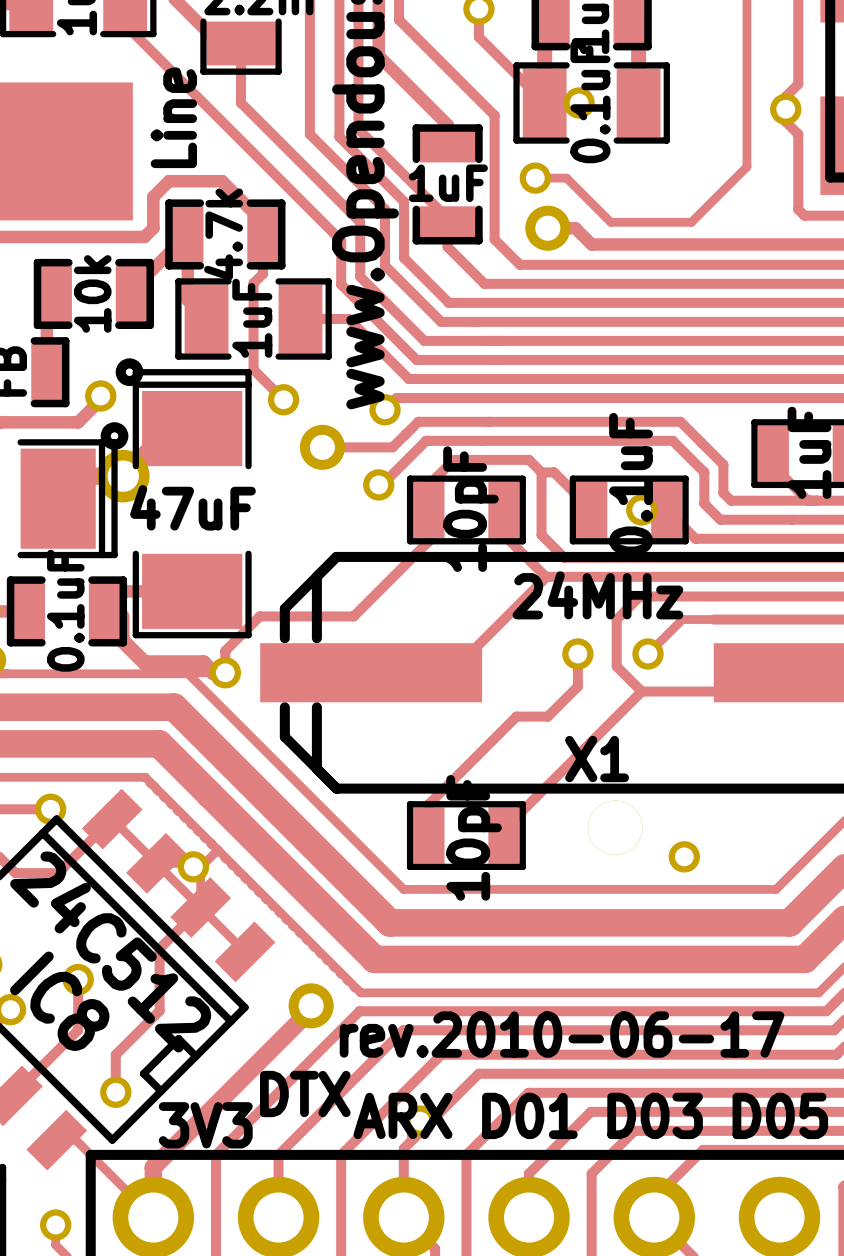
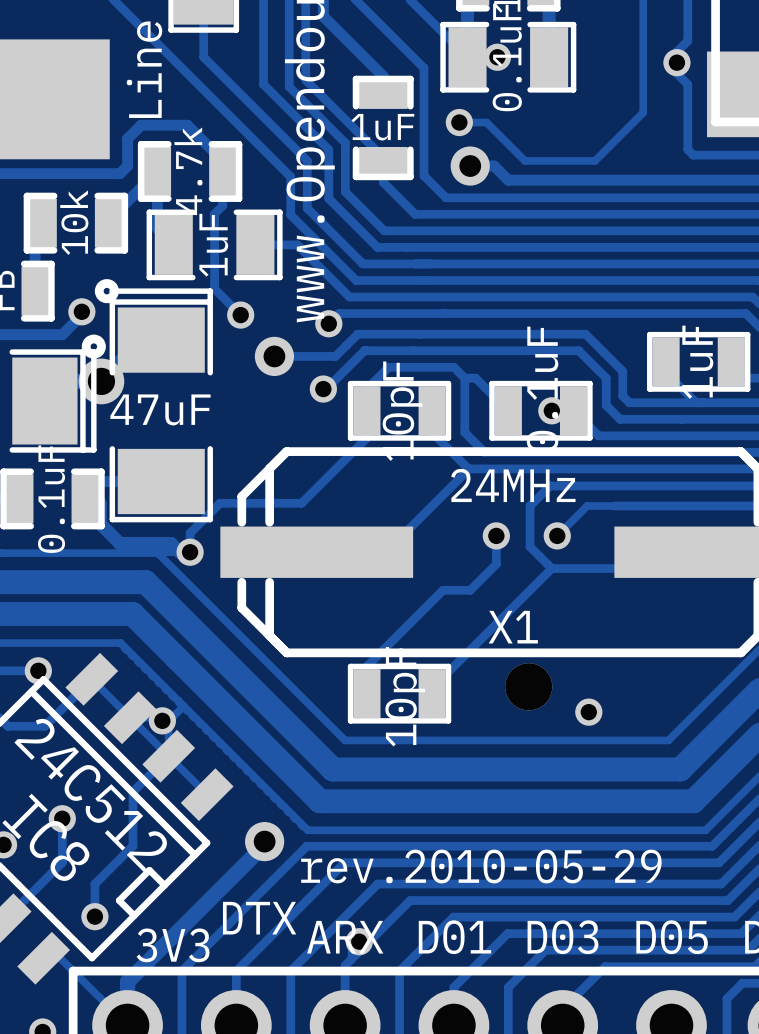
text: rev.2010-06-17 (562, 1034) -> rev.2010-05-29 (481, 866)

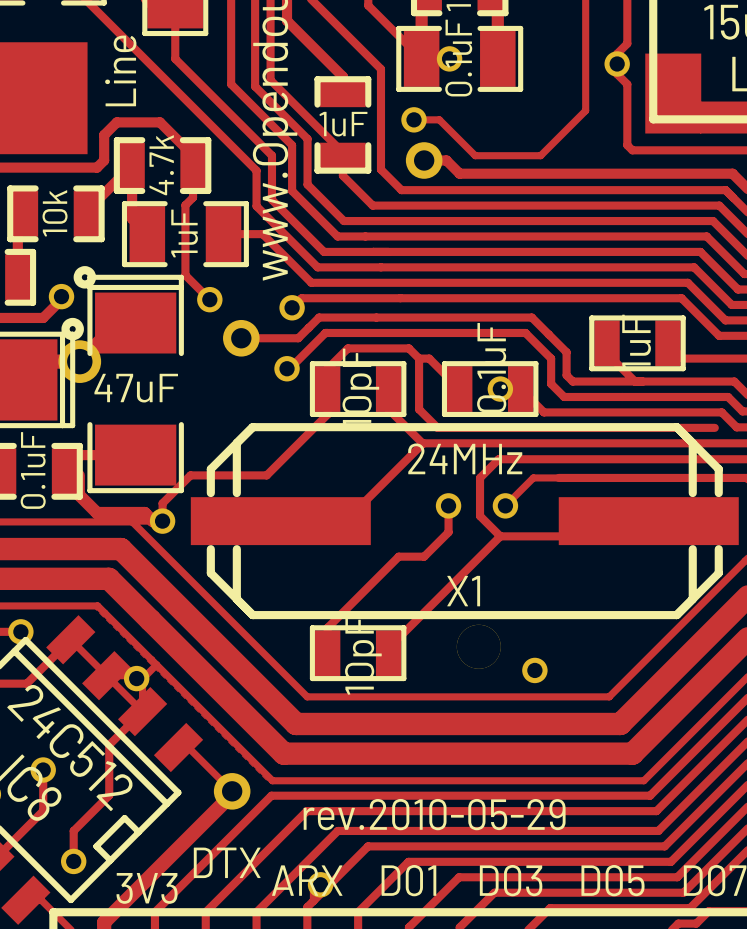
track: (168, 756) (207, 794) -> (232, 791) (188, 747) (178, 747)

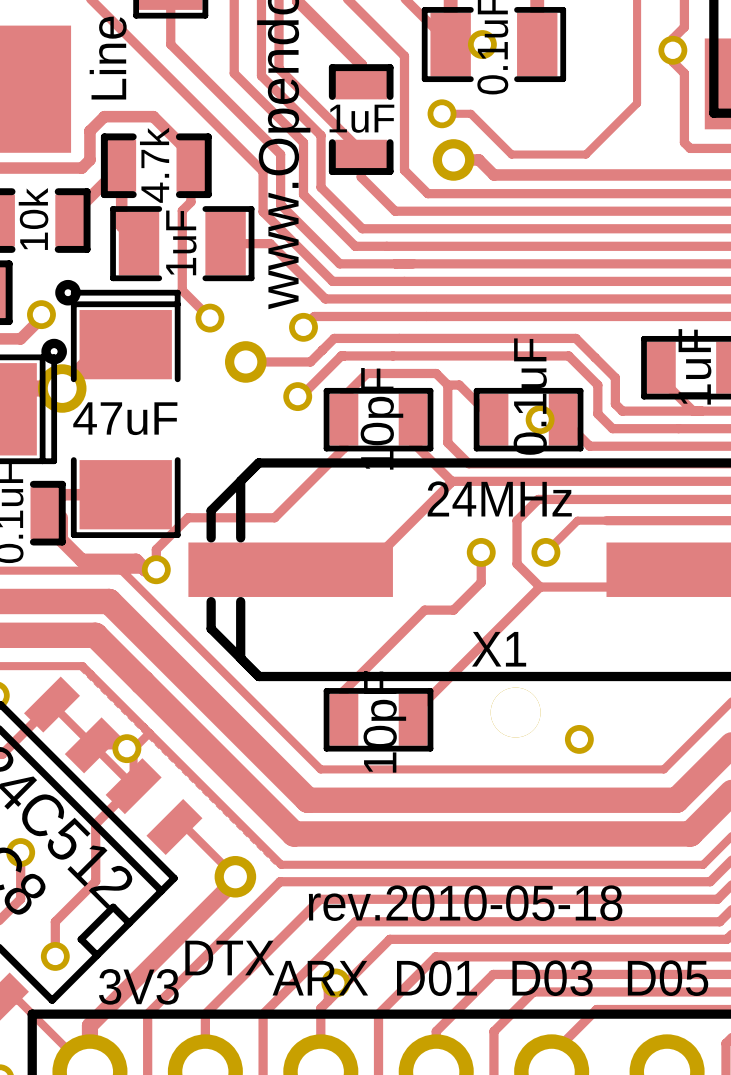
text: rev.2010-05-29 (434, 814) -> rev.2010-05-18 (465, 903)

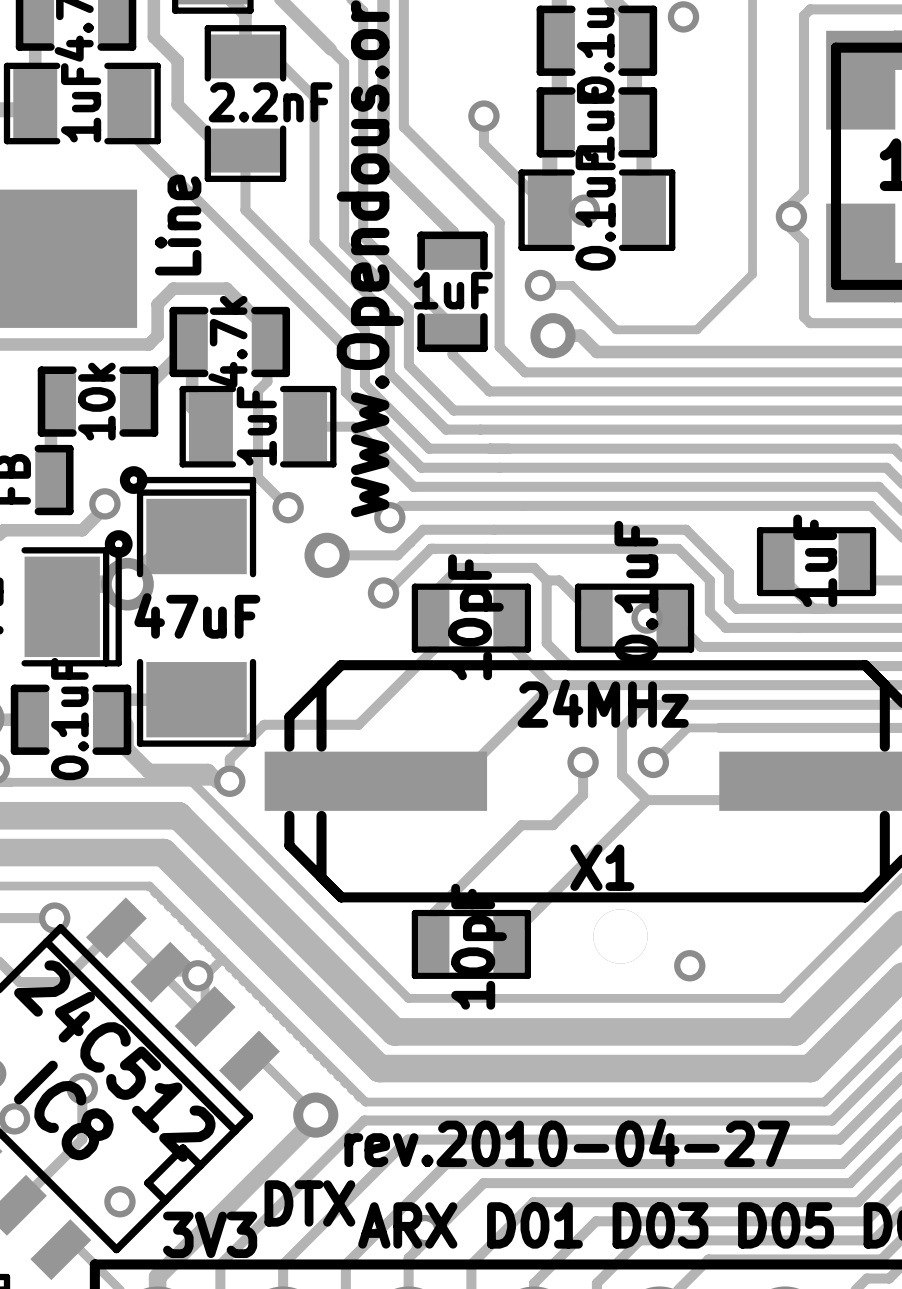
track: (133, 786) (95, 824) (95, 881) (55, 921) (55, 956) -> none
text: rev.2010-05-18 (465, 903) -> rev.2010-04-27 (567, 1142)

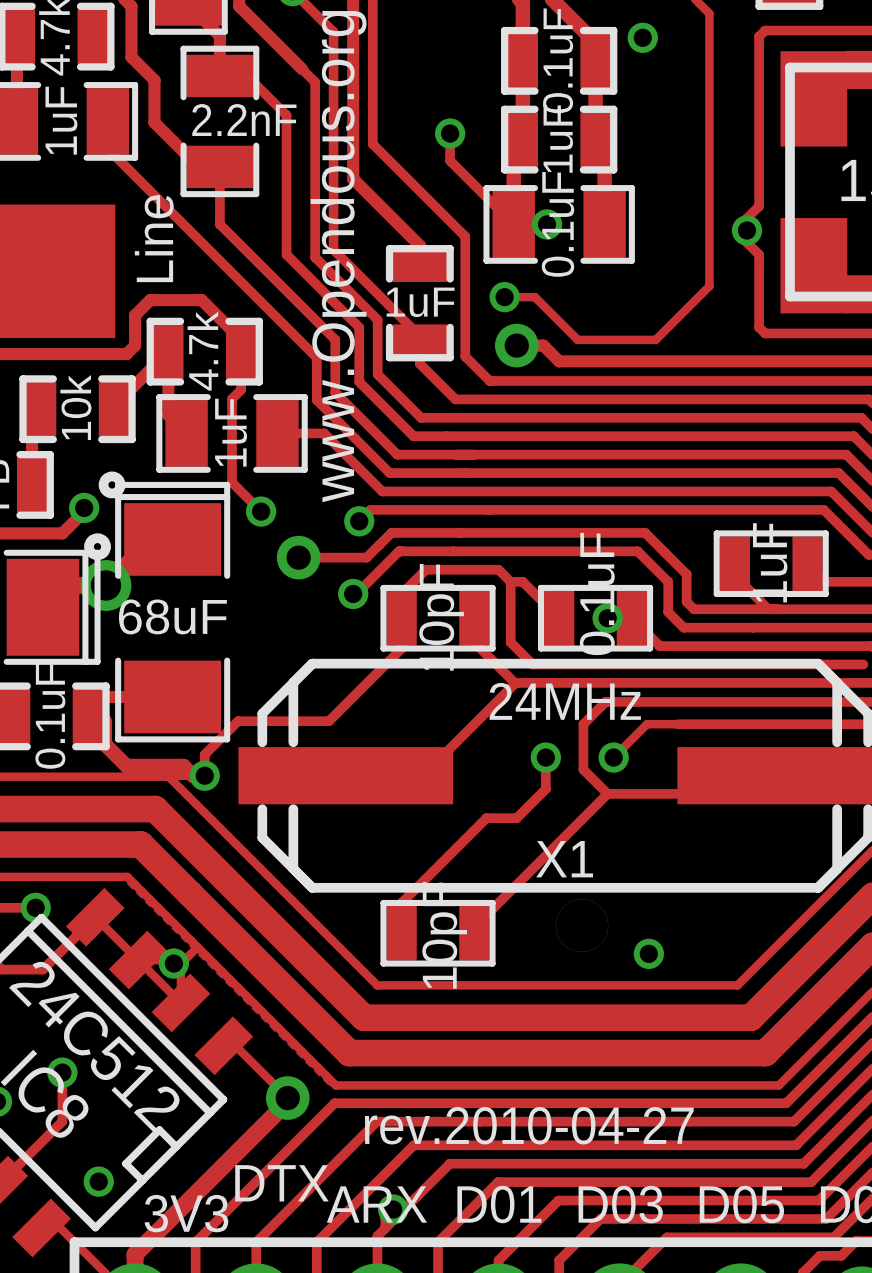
part value: 47uF (197, 615) -> 68uF (172, 616)

